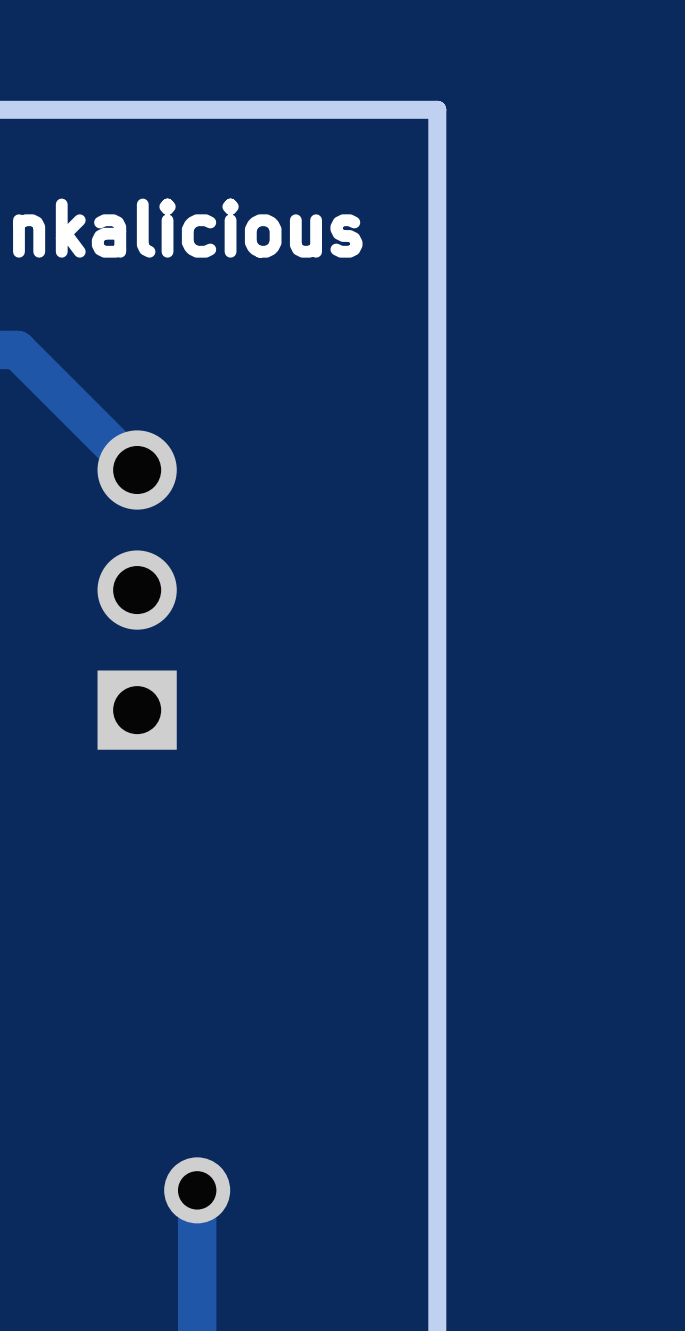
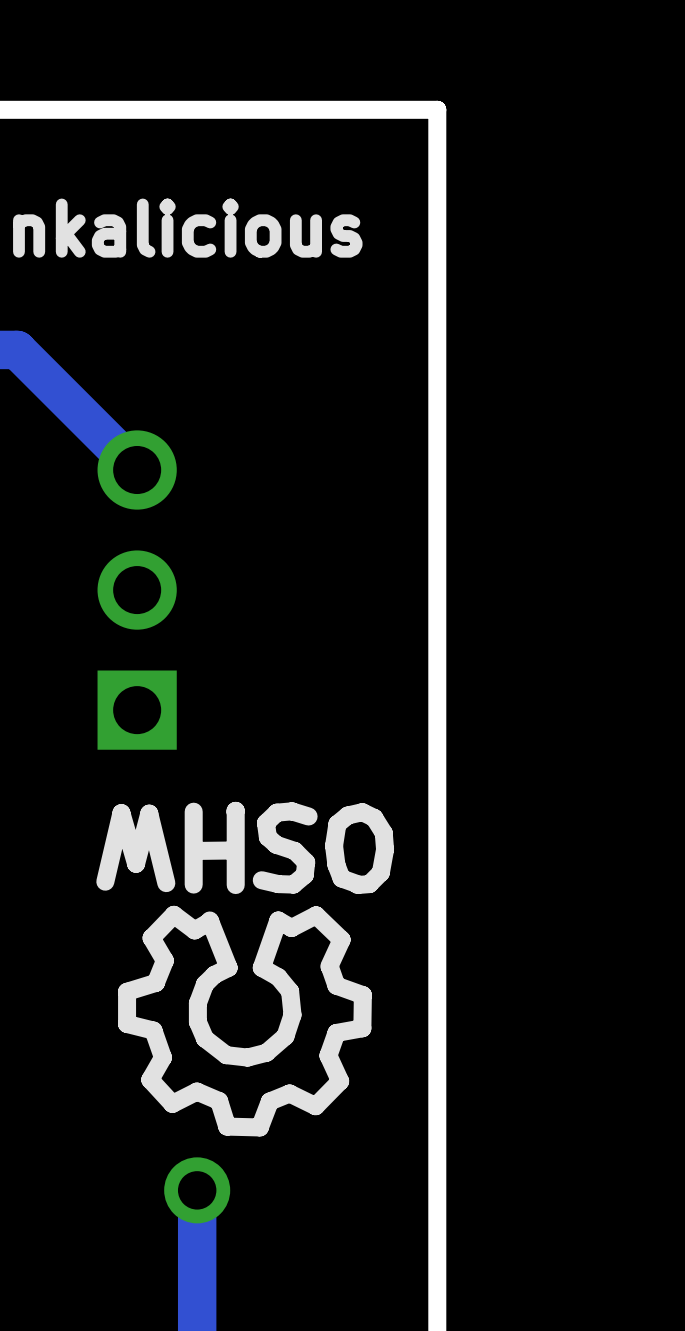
drawing: none -> [96, 801, 395, 1137]

